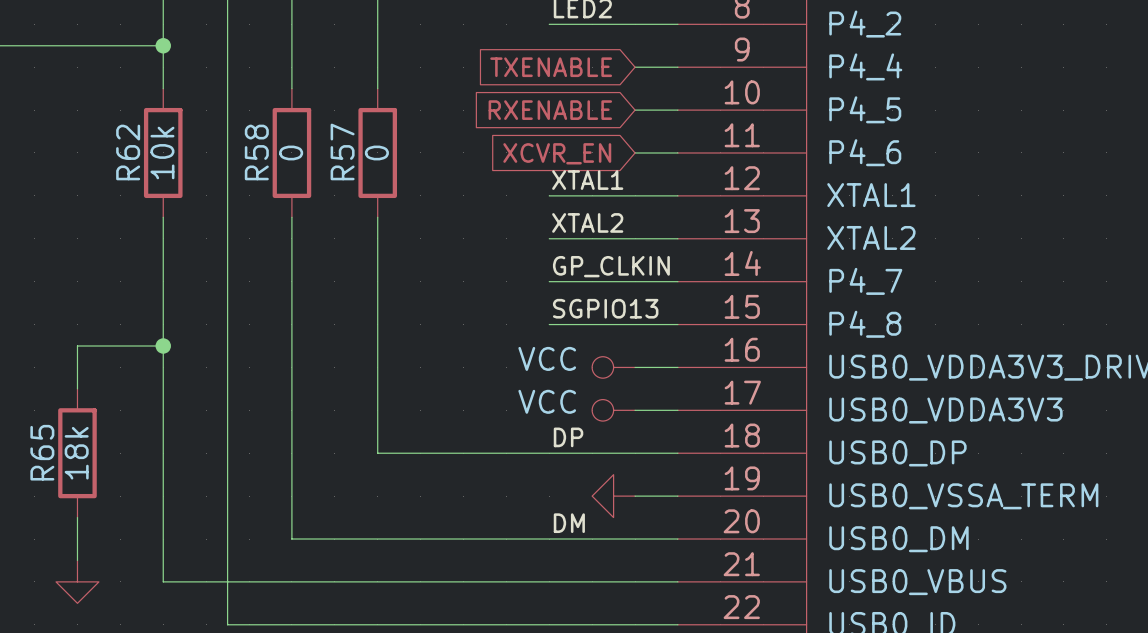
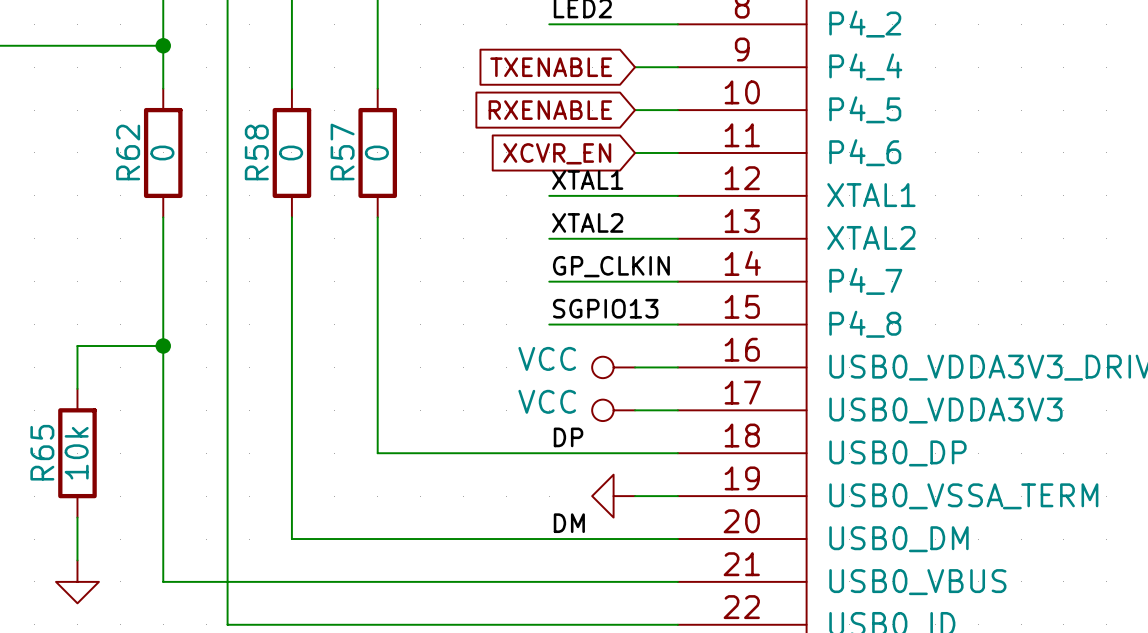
R62 value: 10k (162, 152) -> 0 (162, 152)
R65 value: 18k (76, 453) -> 10k (76, 453)

